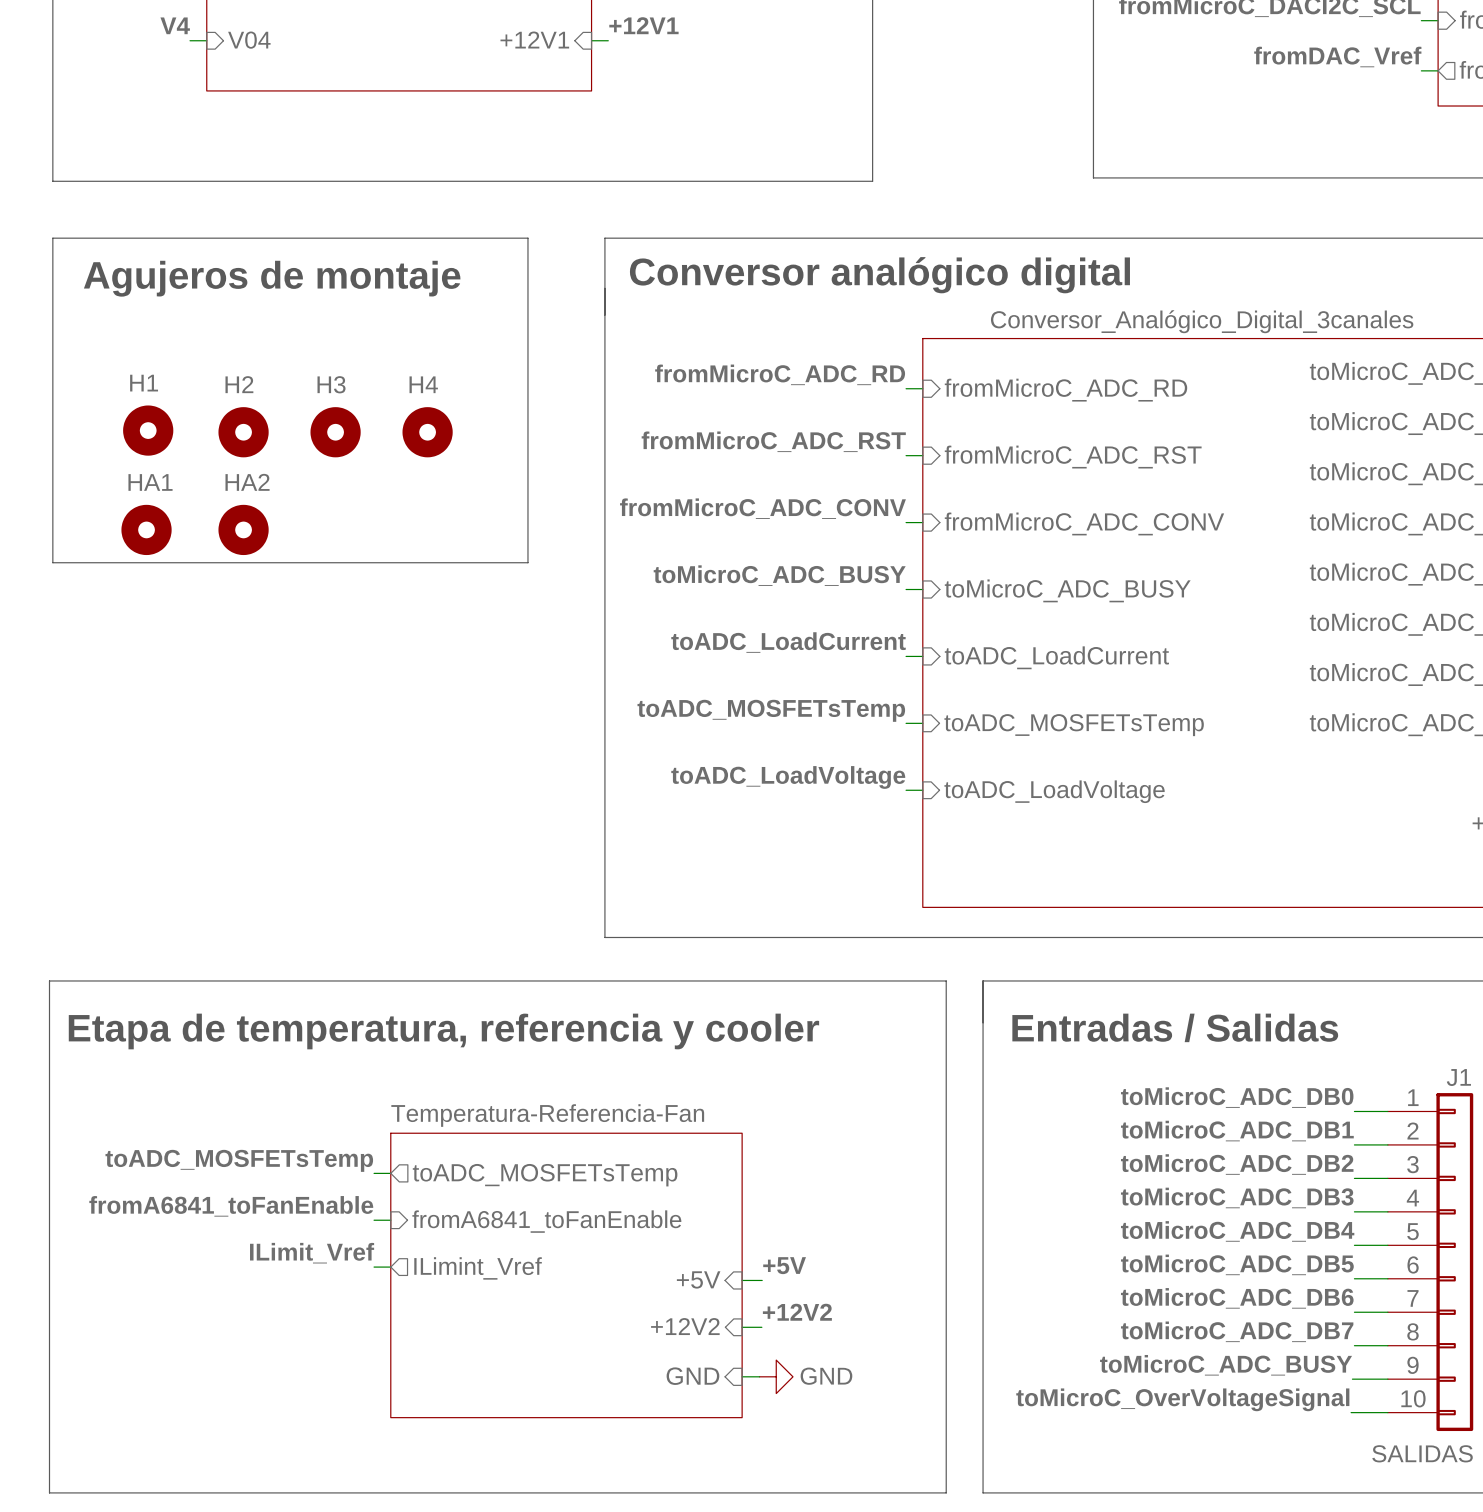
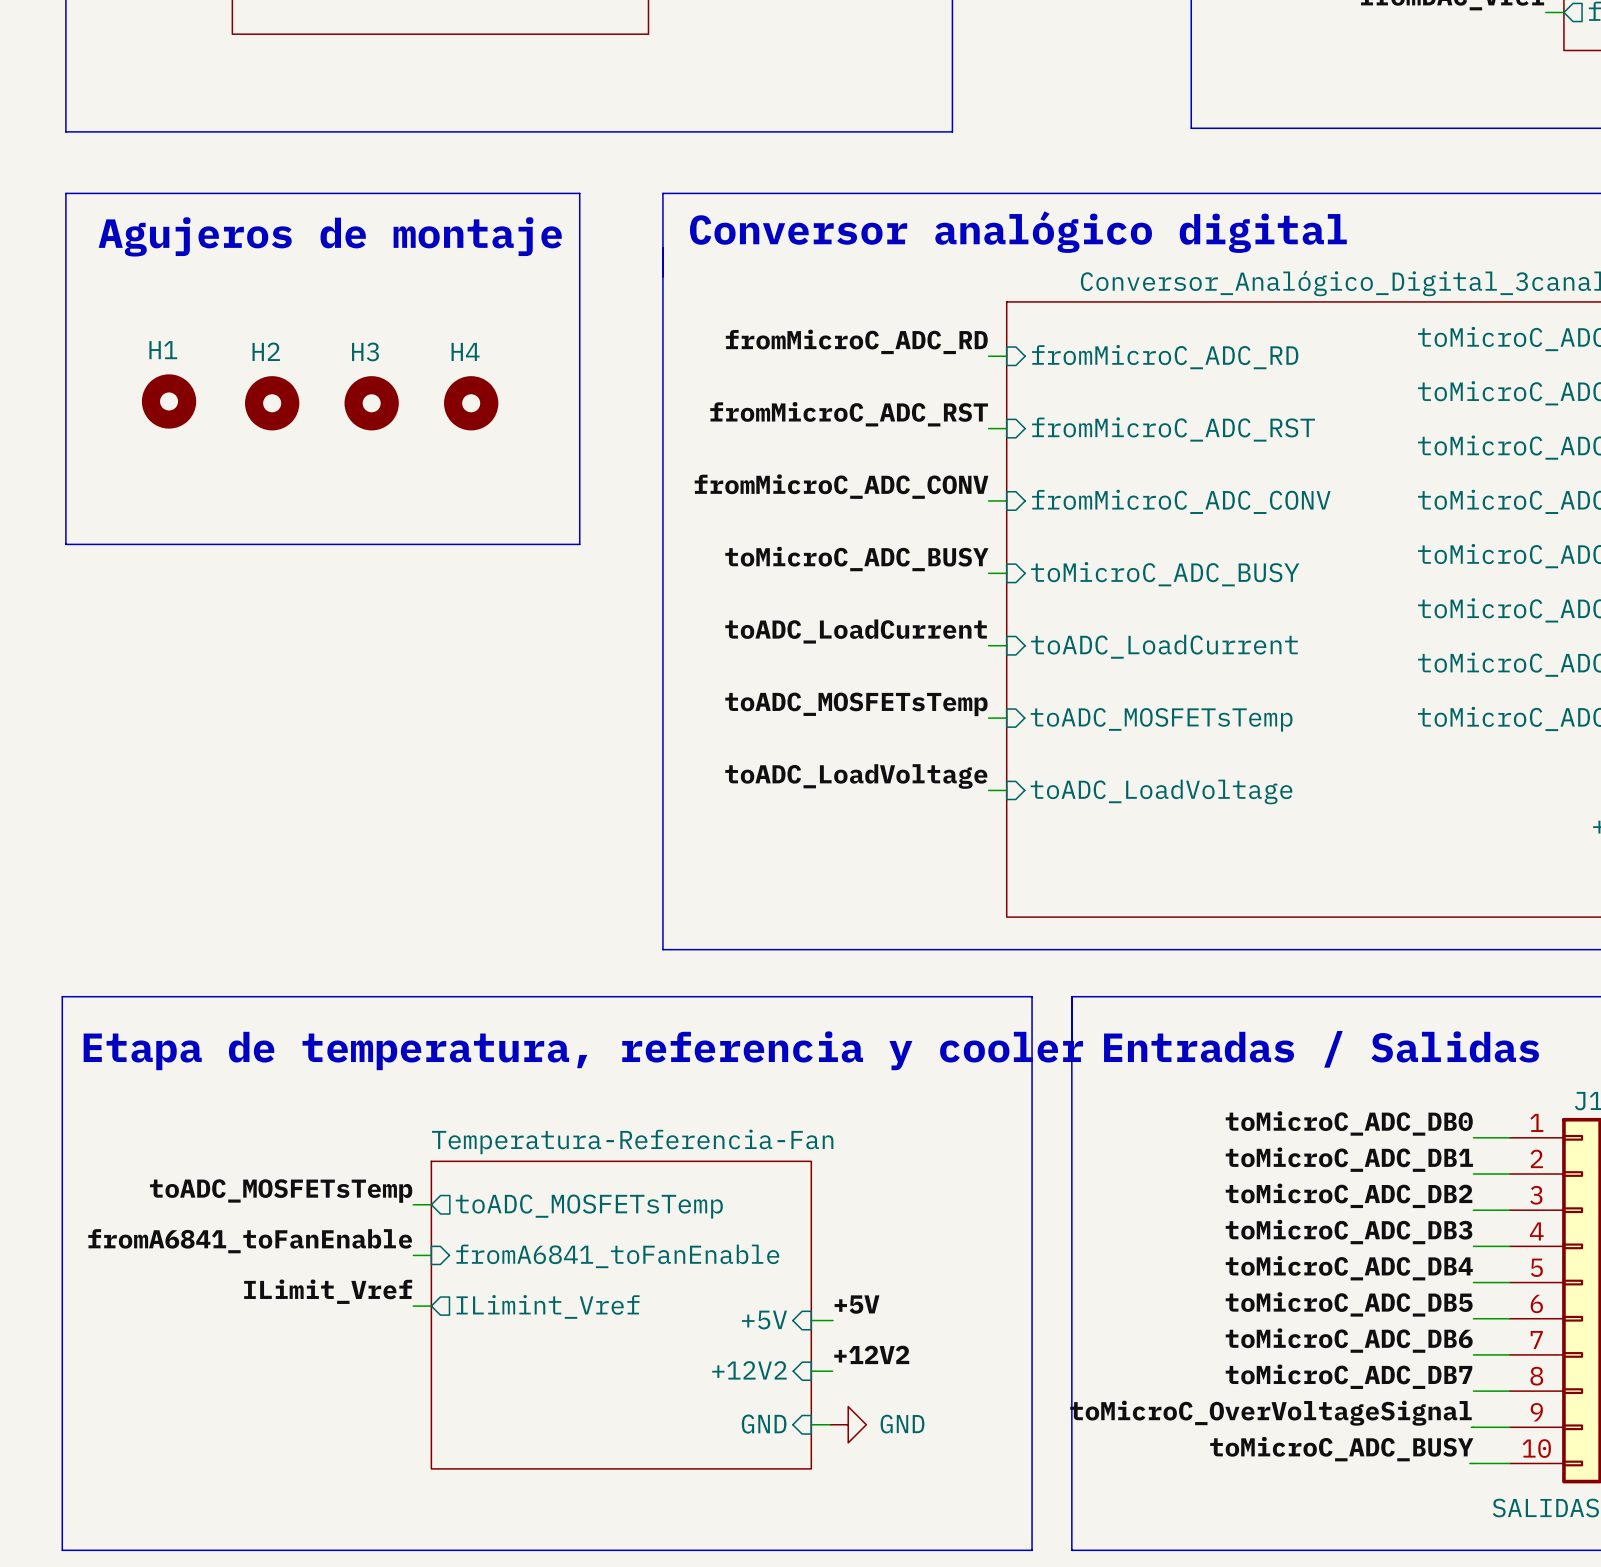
HA1: (146, 529) -> none
HA2: (243, 529) -> none
label: toMicroC_ADC_BUSY (1226, 1365) -> toMicroC_OverVoltageSignal (1270, 1413)
label: toMicroC_OverVoltageSignal (1182, 1399) -> toMicroC_ADC_BUSY (1341, 1449)

